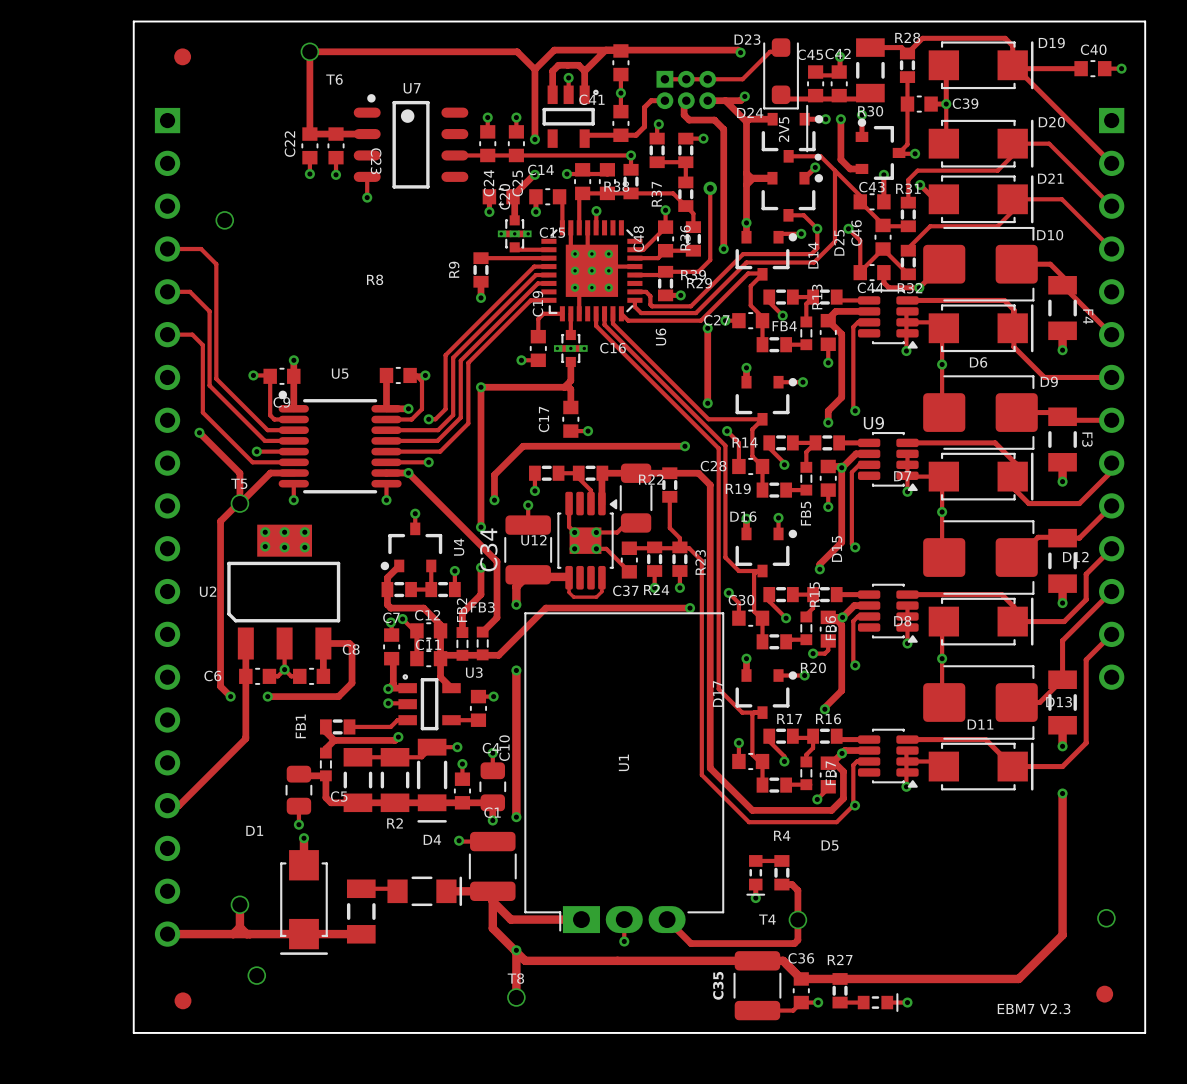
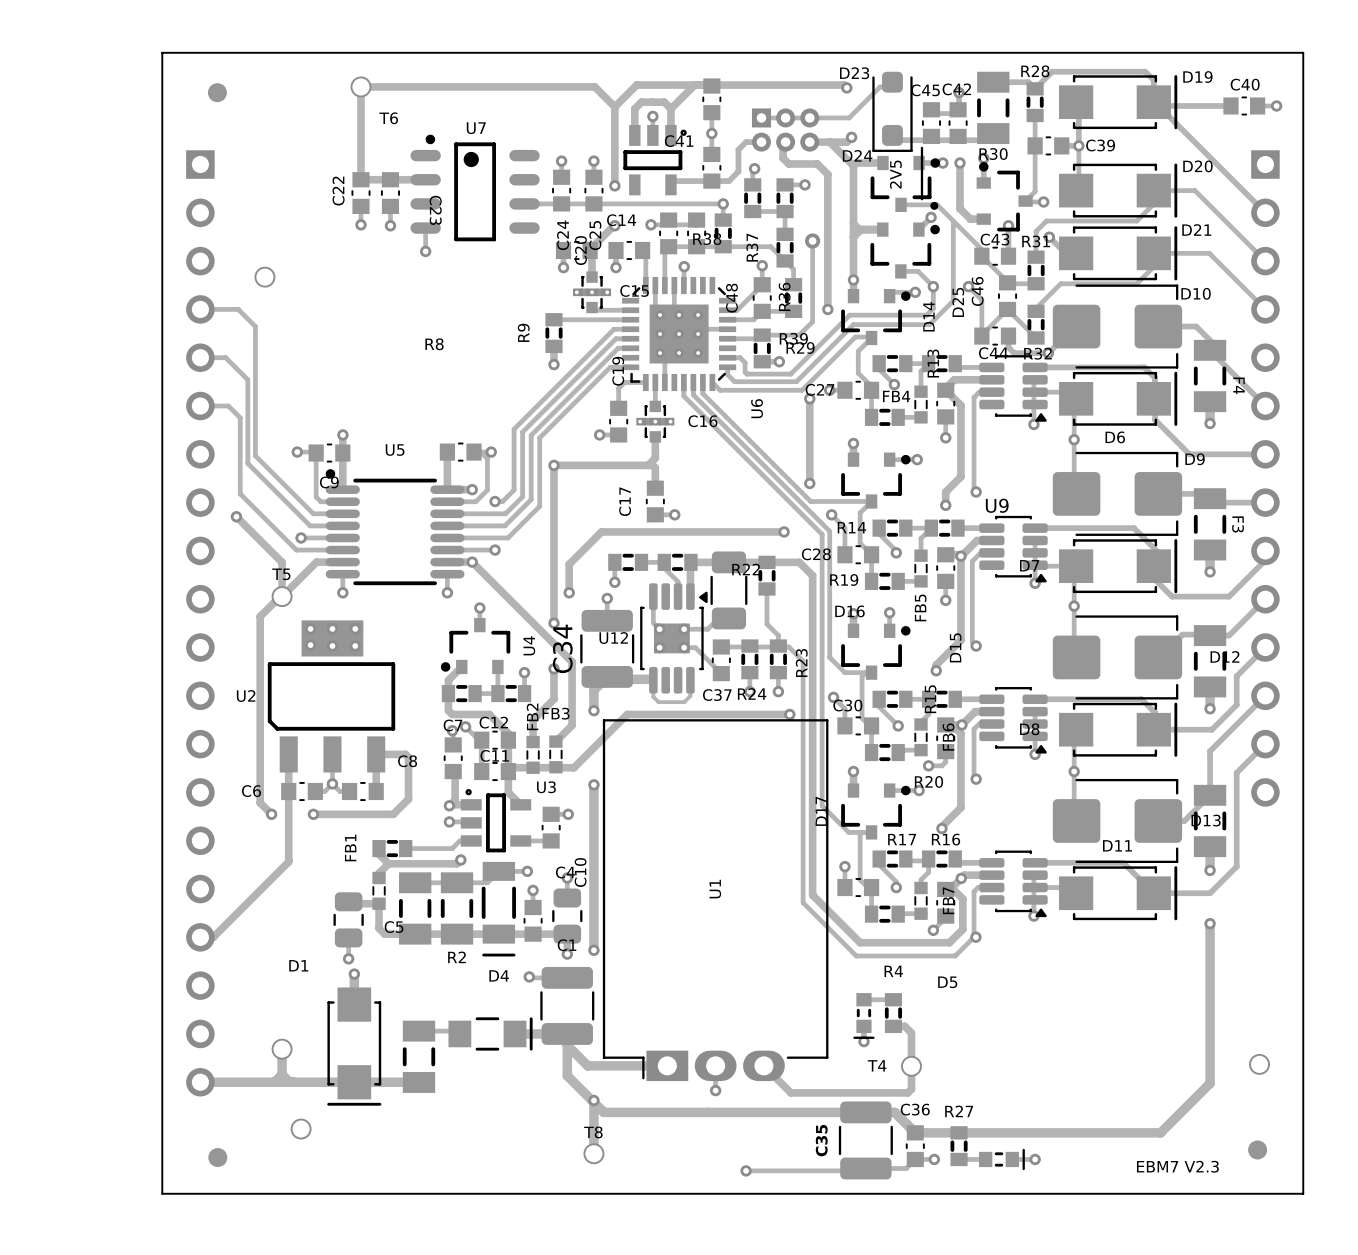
track: none -> (746, 1170) (863, 1170)
via: none -> (746, 1170)

